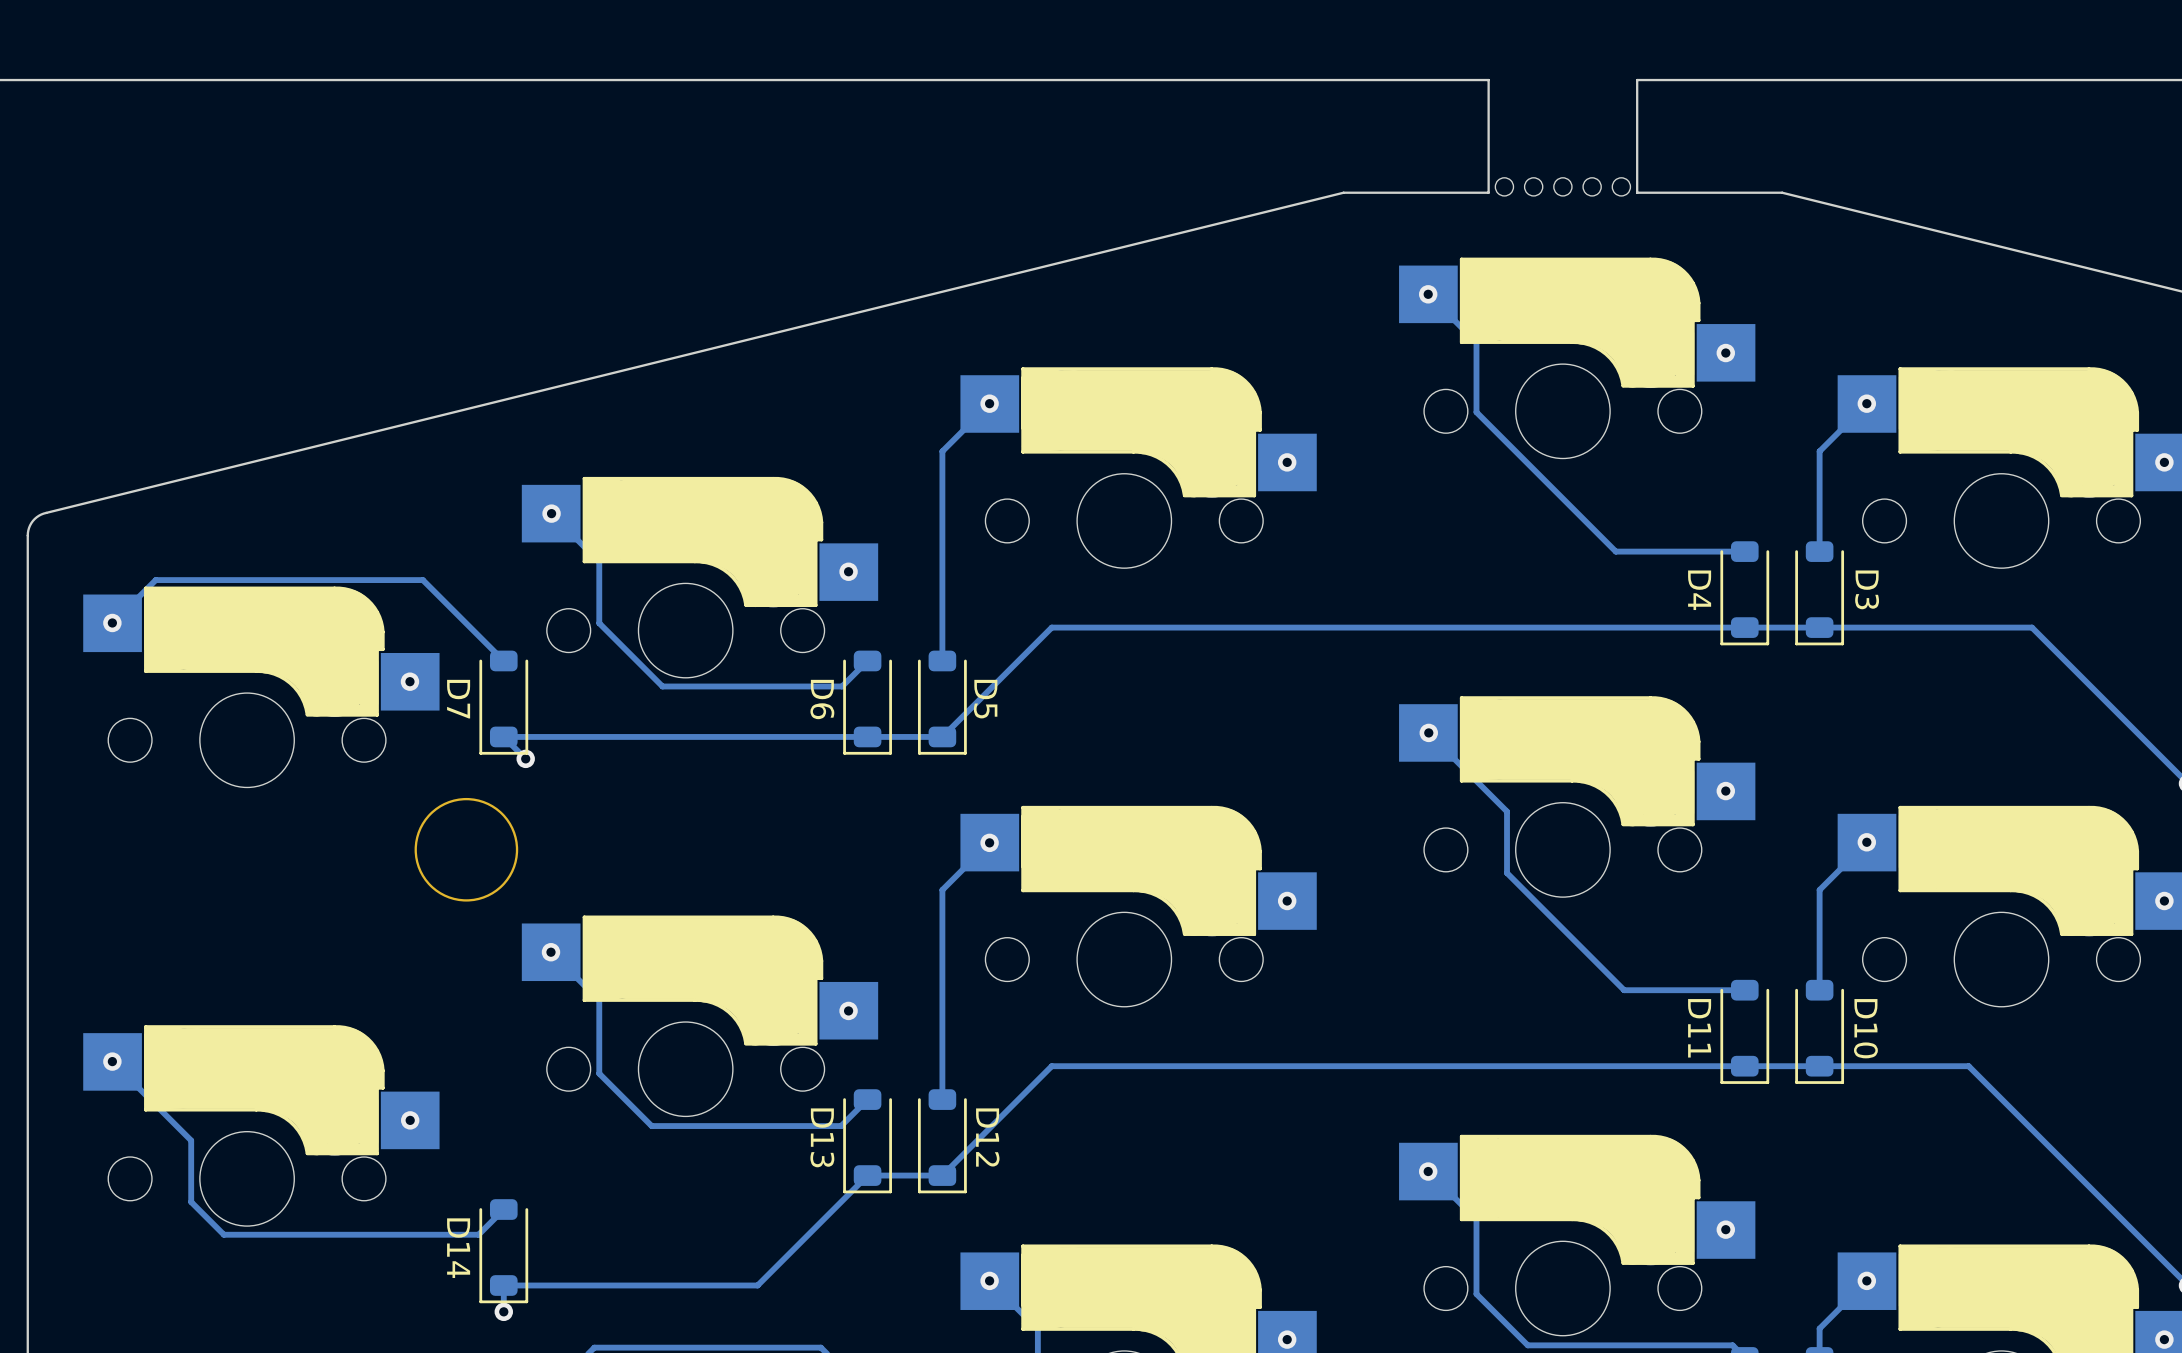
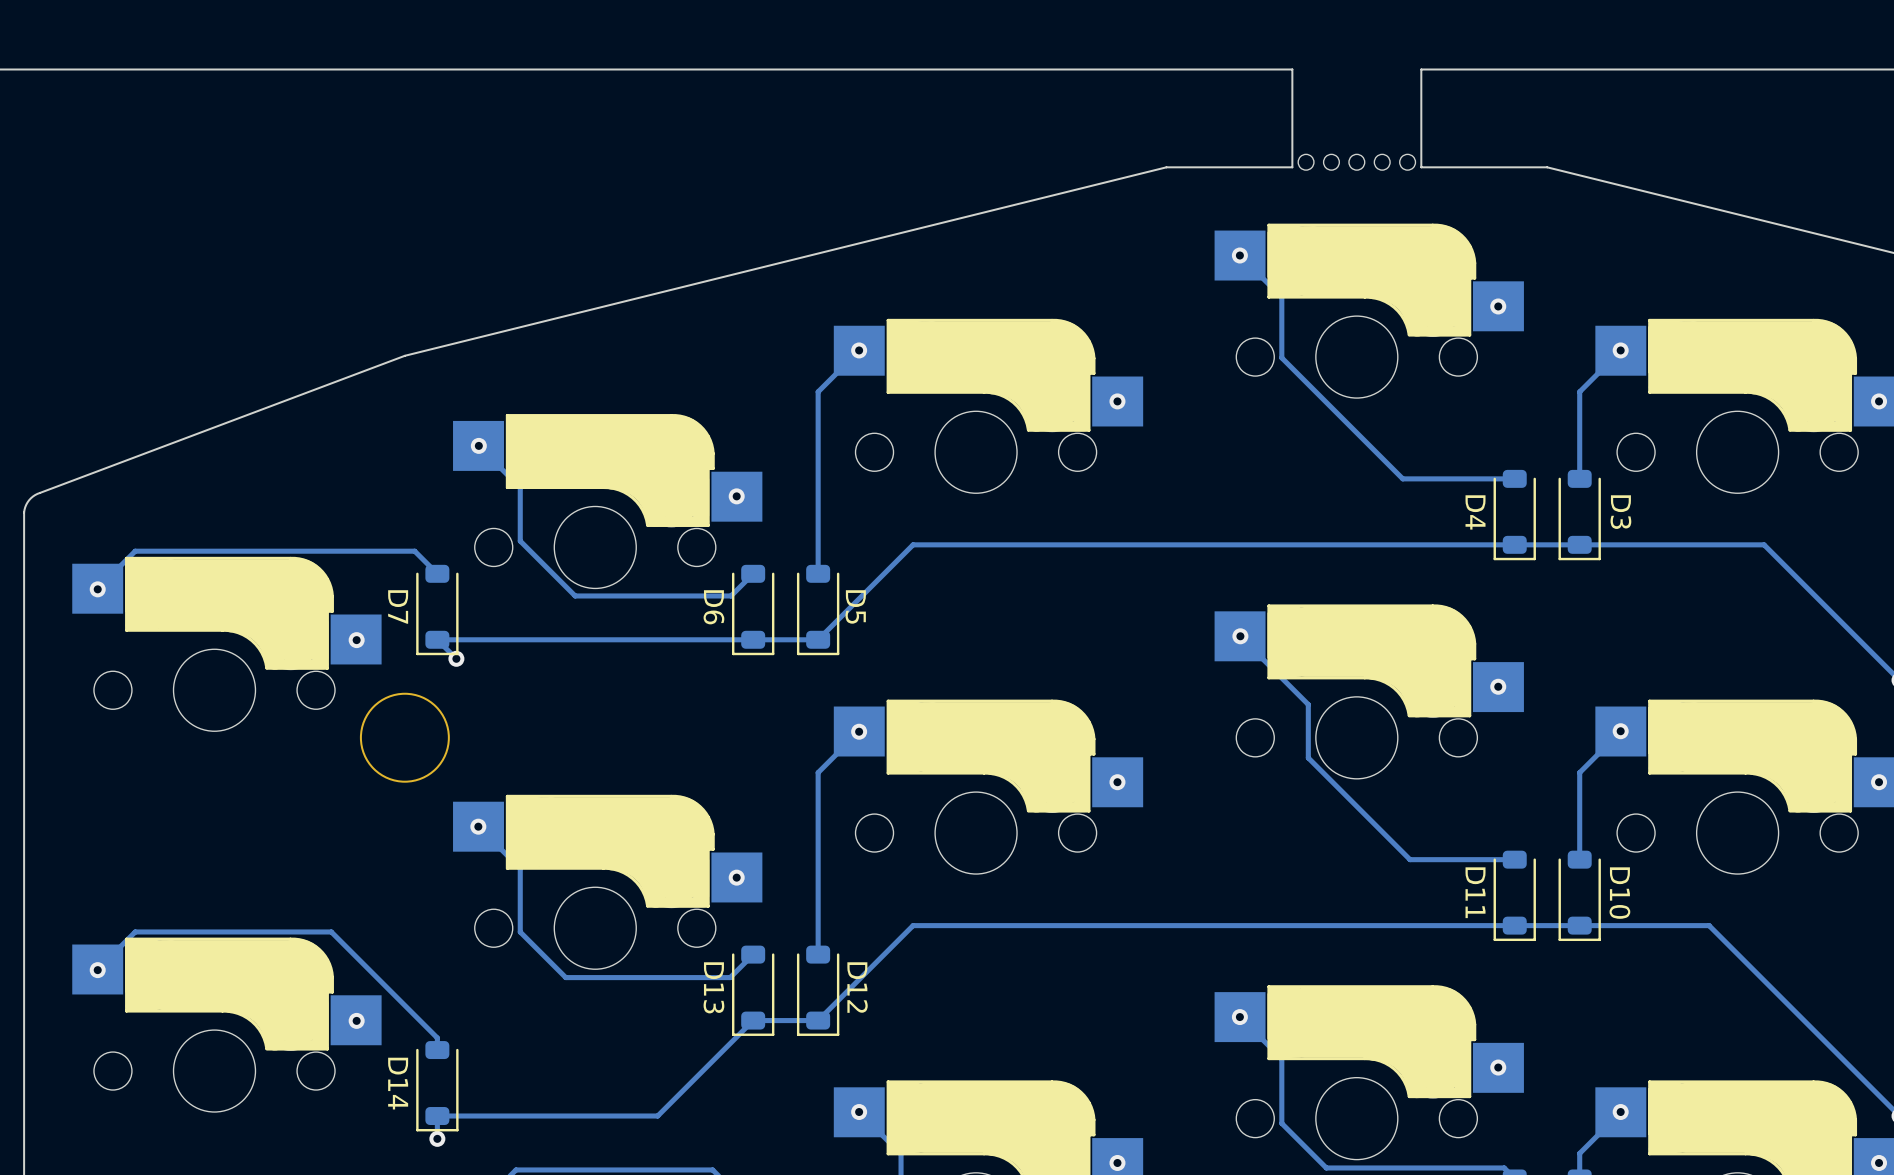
board edge: (1343, 192) (43, 513) (34, 518) (28, 530) (27, 590) -> (1166, 167) (404, 355) (37, 493) (29, 500) (24, 512)
via position: (112, 622) -> (97, 589)
track: (112, 623) (155, 580) (422, 580) (477, 634) -> (97, 589) (135, 551) (414, 551)
via position: (409, 681) -> (356, 640)
part position: (261, 687) -> (226, 644)
track: (112, 1061) (191, 1140) (191, 1202) (223, 1234) (478, 1234) (503, 1209) -> (97, 970) (135, 931) (331, 931) (437, 1037) (437, 1050)
via position: (112, 1061) -> (97, 970)
via position: (410, 1120) -> (356, 1020)
part position: (261, 1125) -> (226, 1024)

